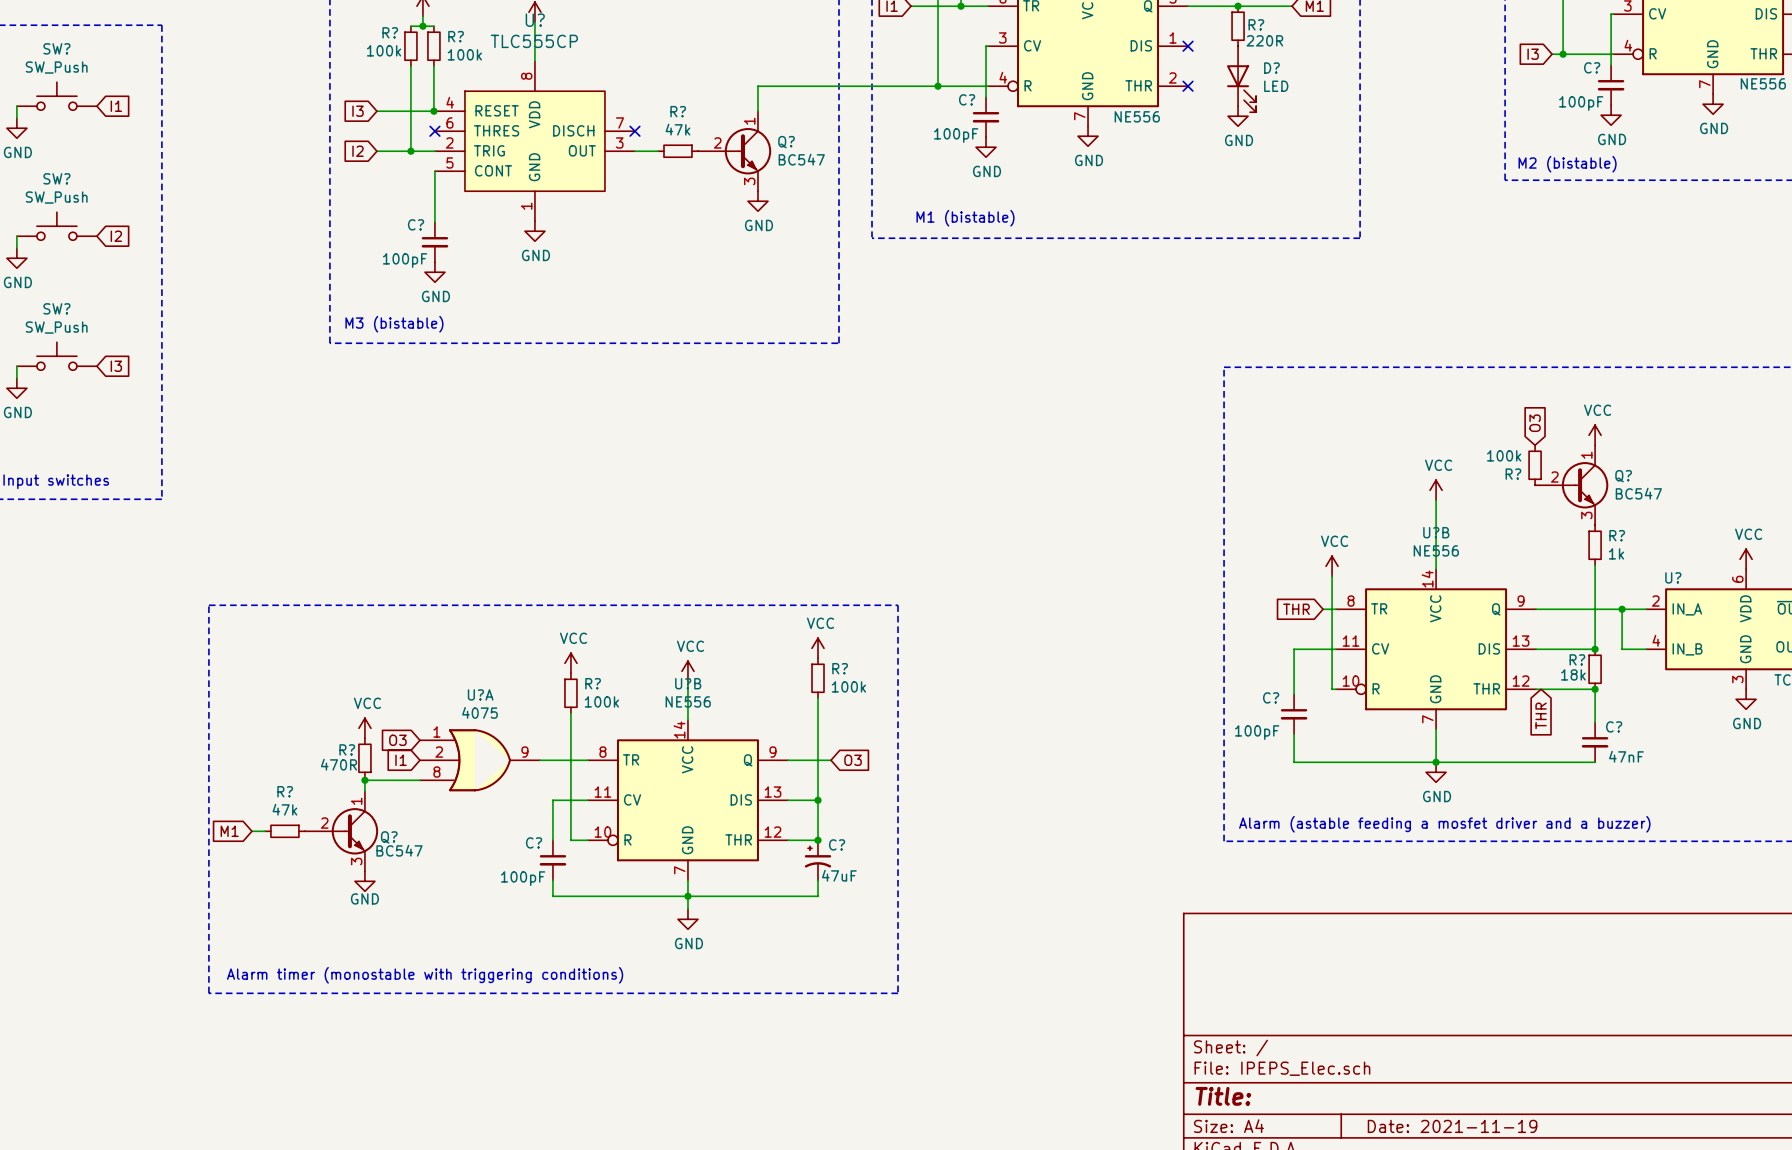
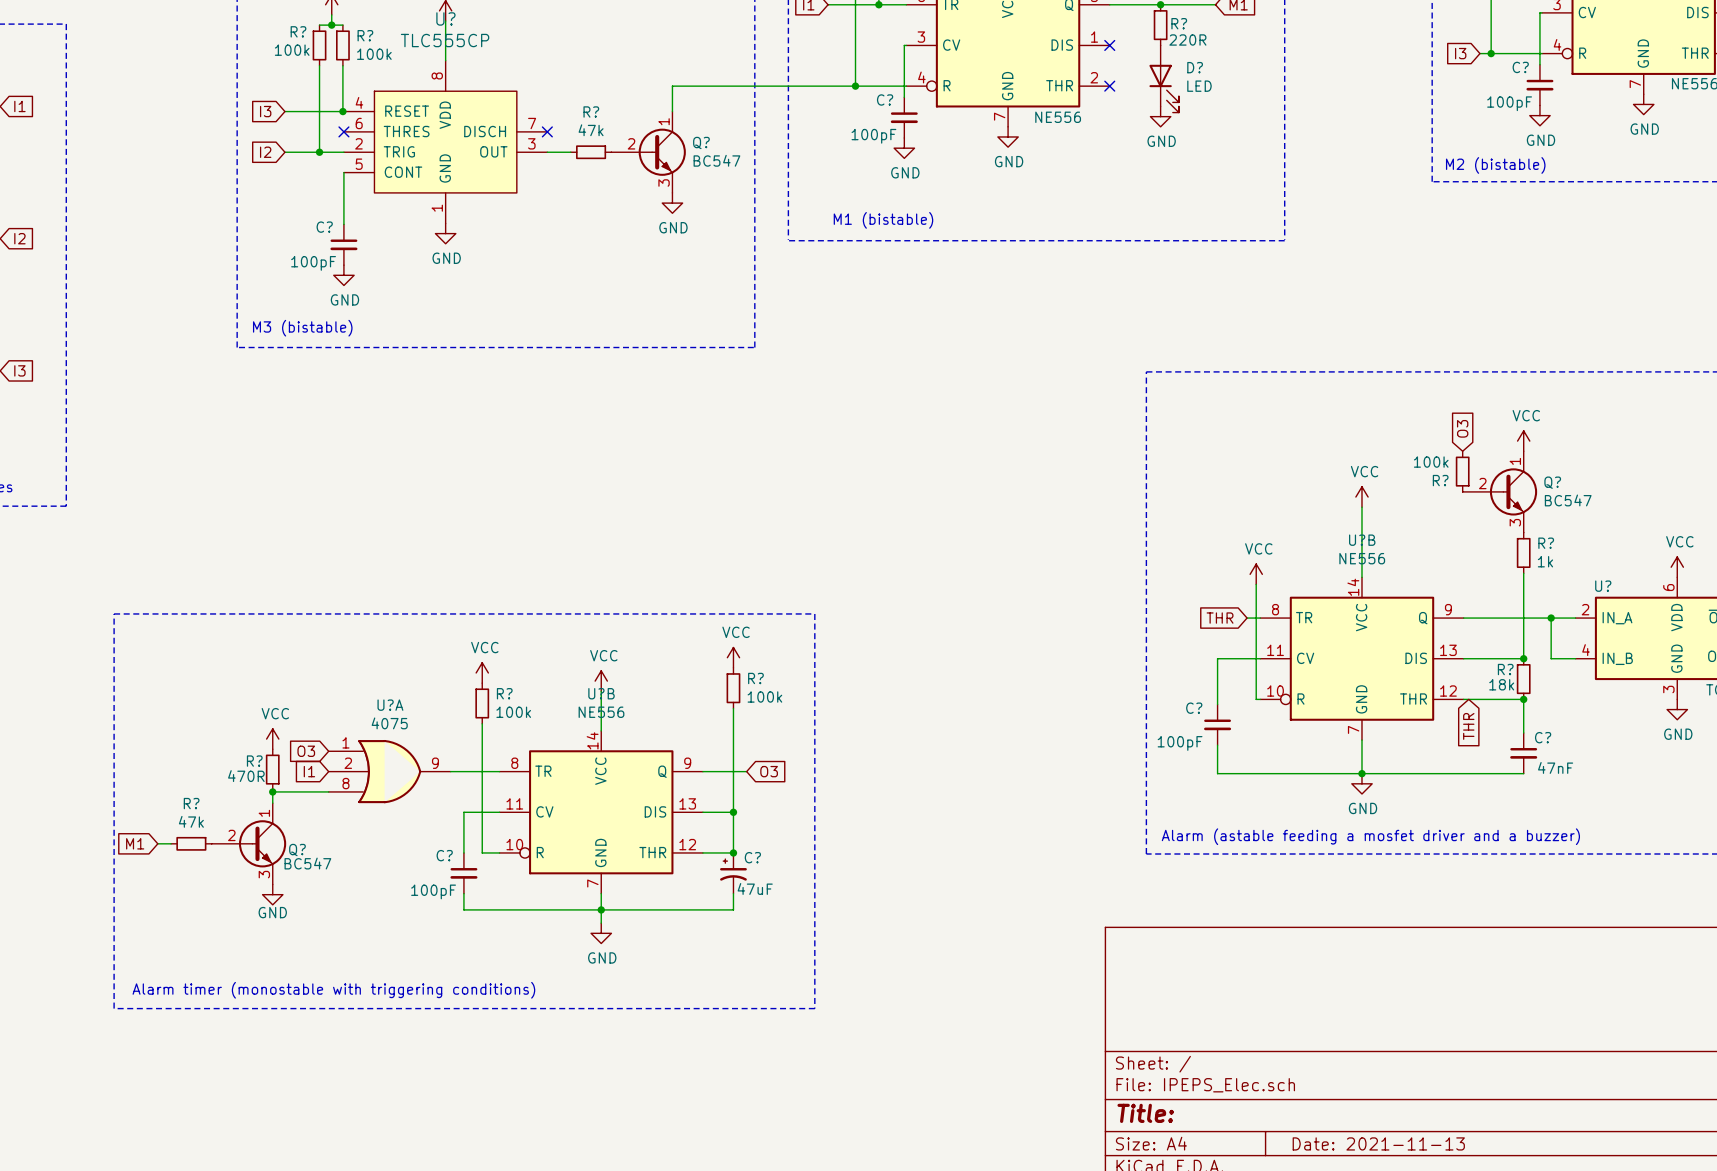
title block: Date: 2021-11-19 (1452, 1126) -> Date: 2021-11-13 (1378, 1143)

